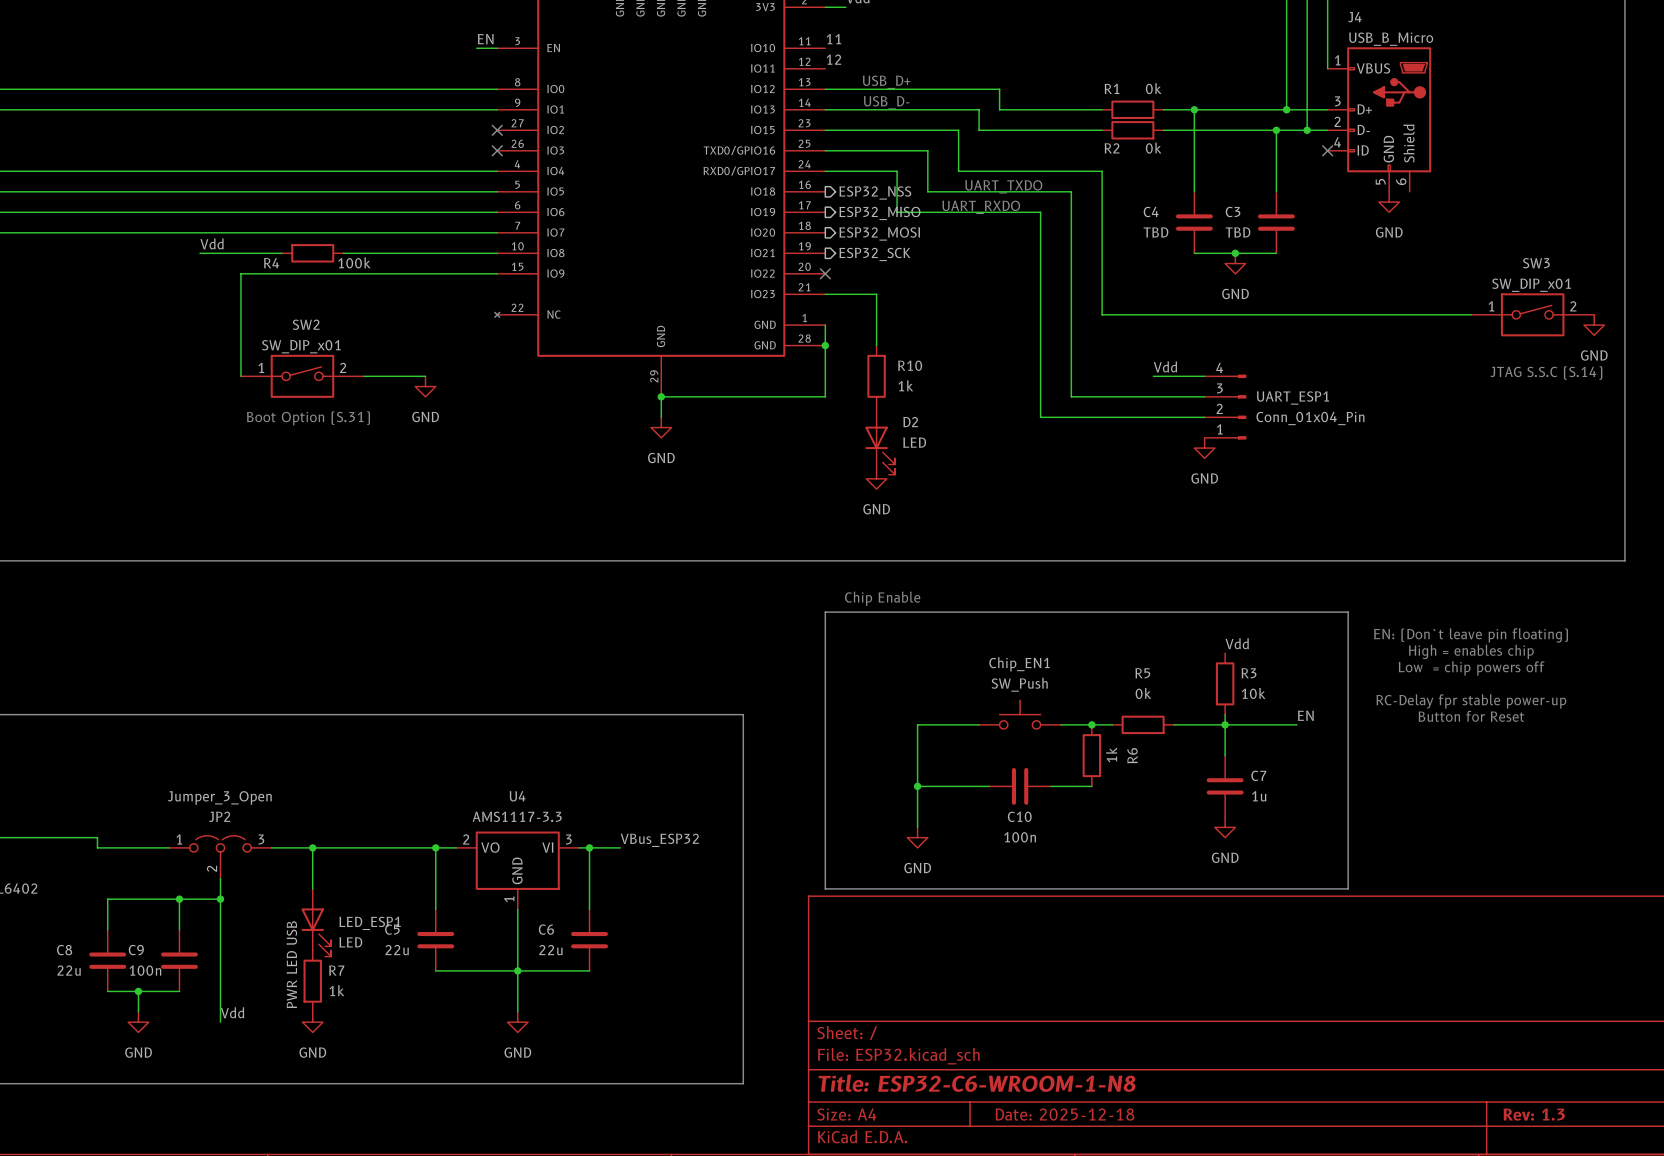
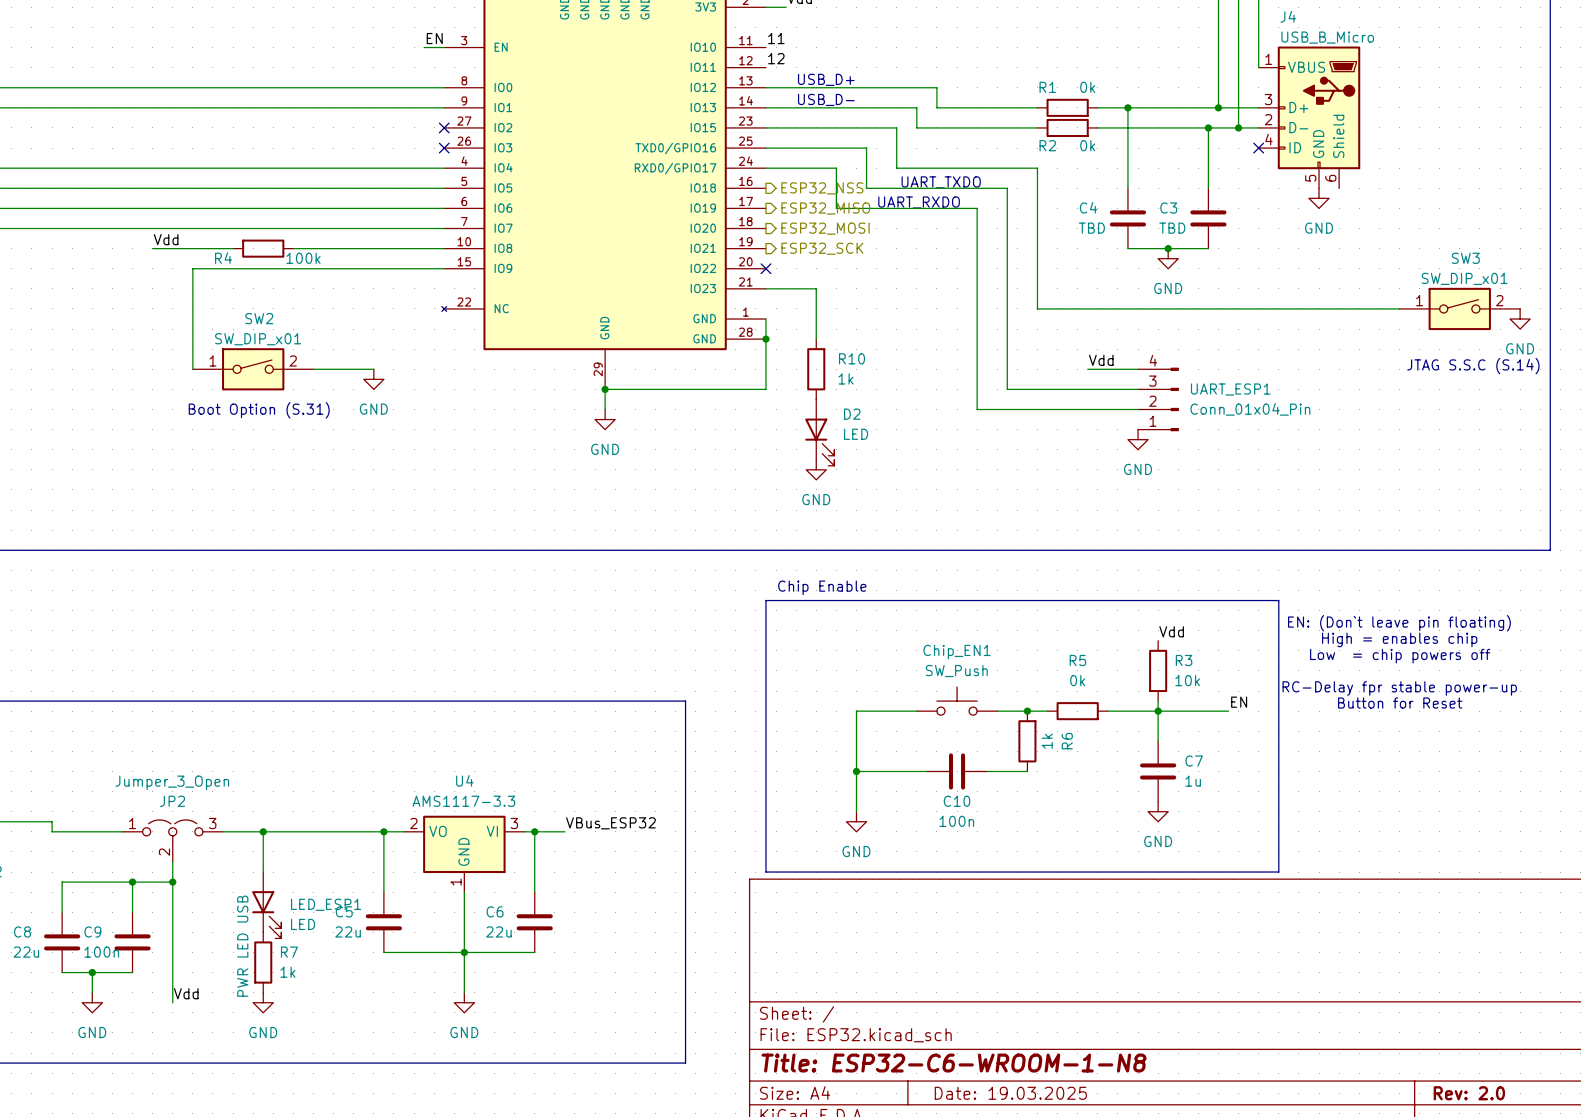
title block: Date: 2025-12-18 (1064, 1114) -> Date: 19.03.2025 (1010, 1093)
title block: Rev: 1.3 (1534, 1114) -> Rev: 2.0 (1469, 1093)

